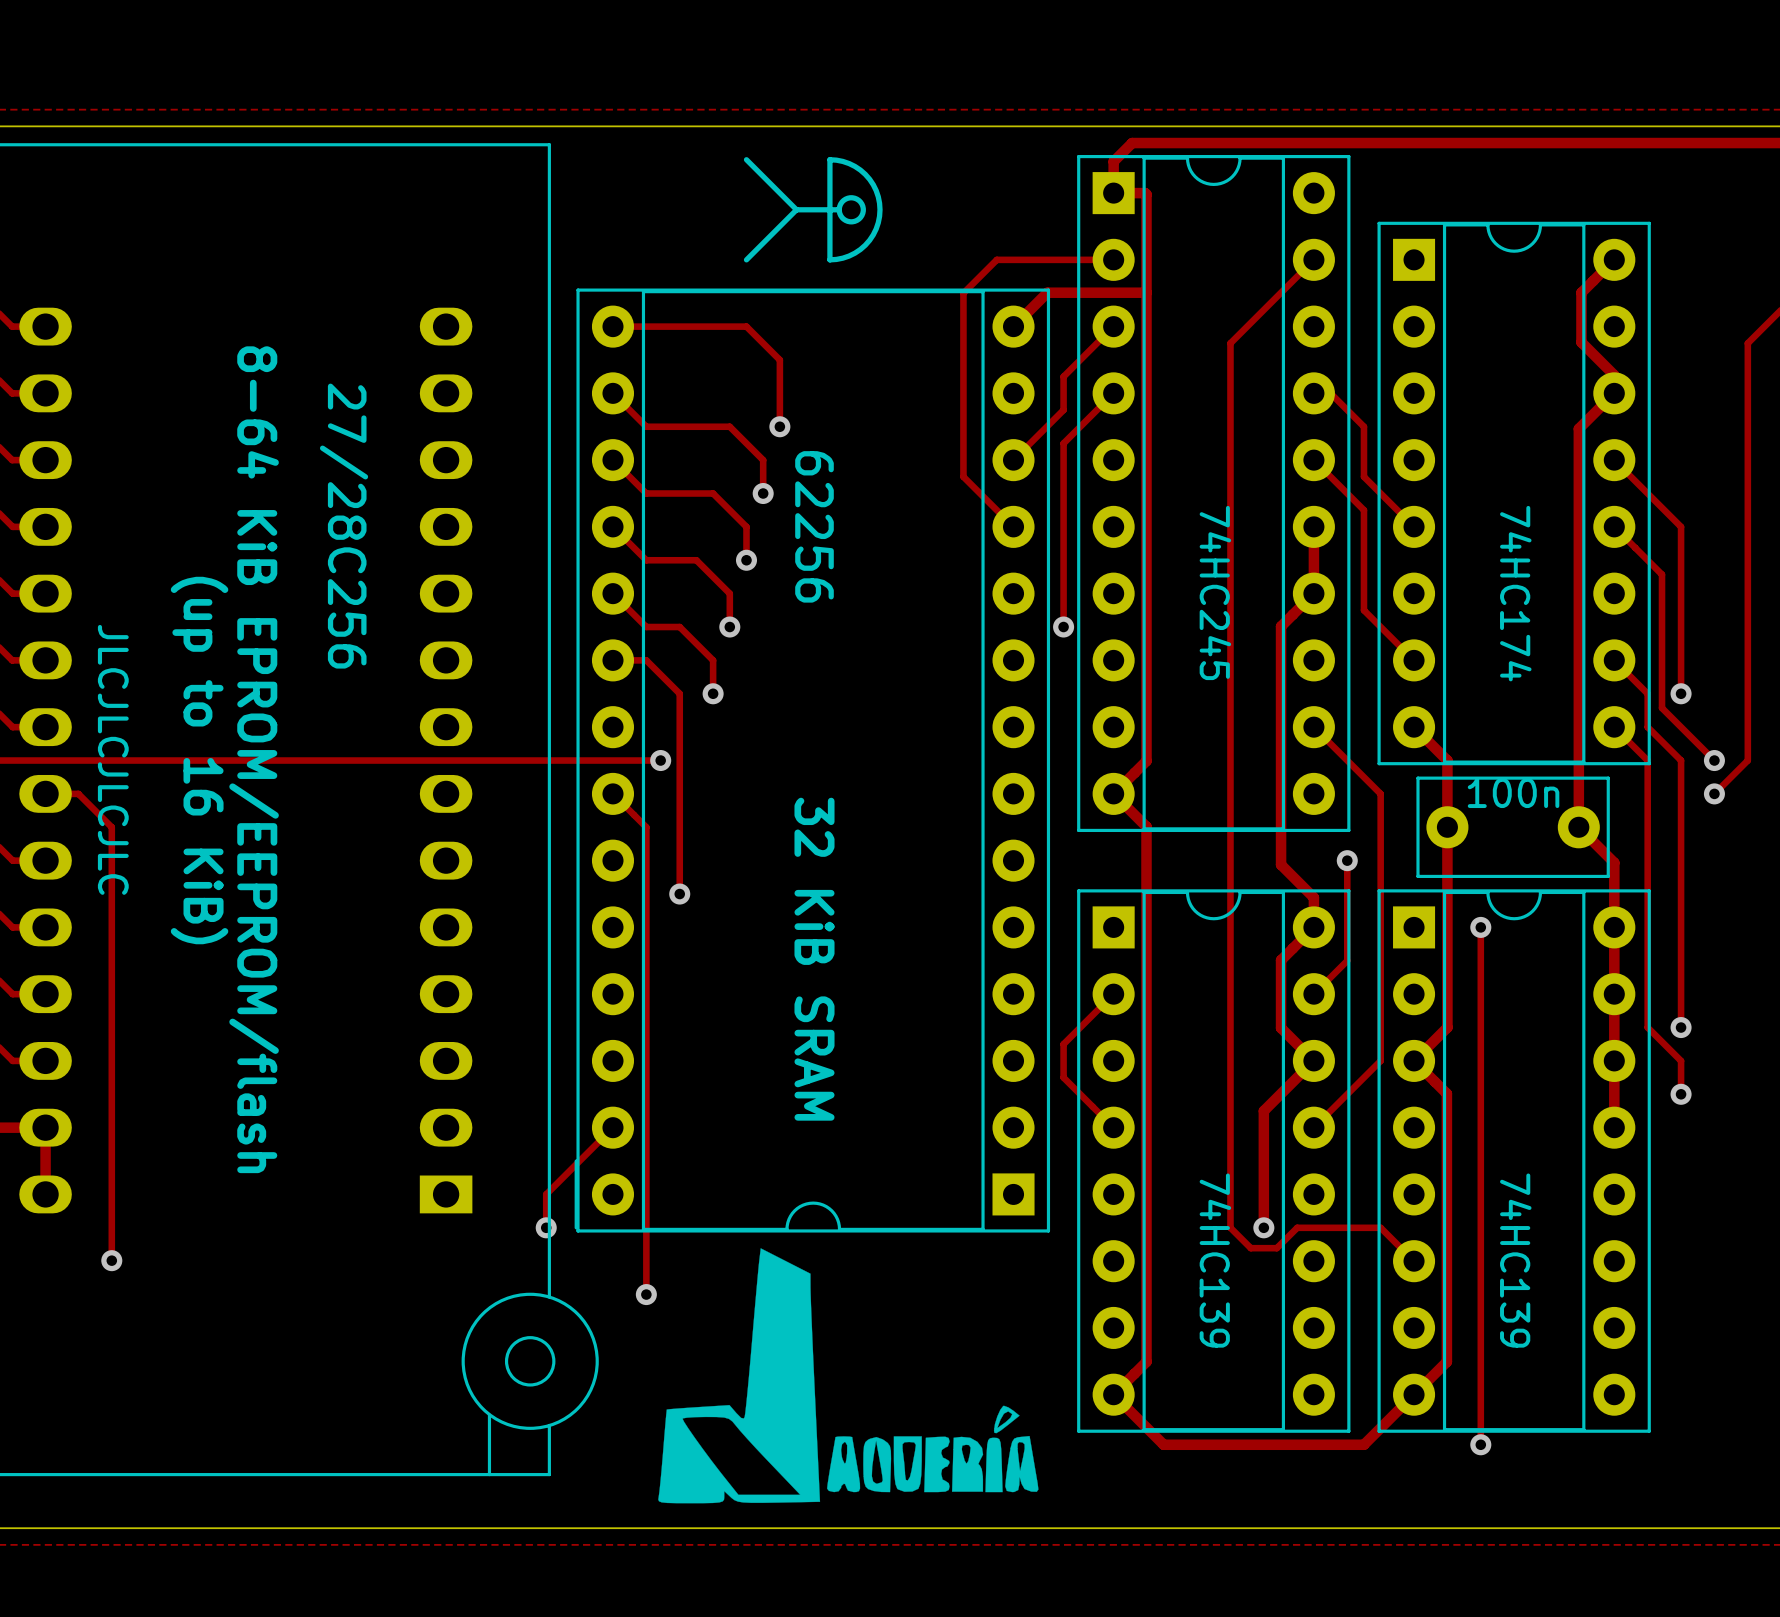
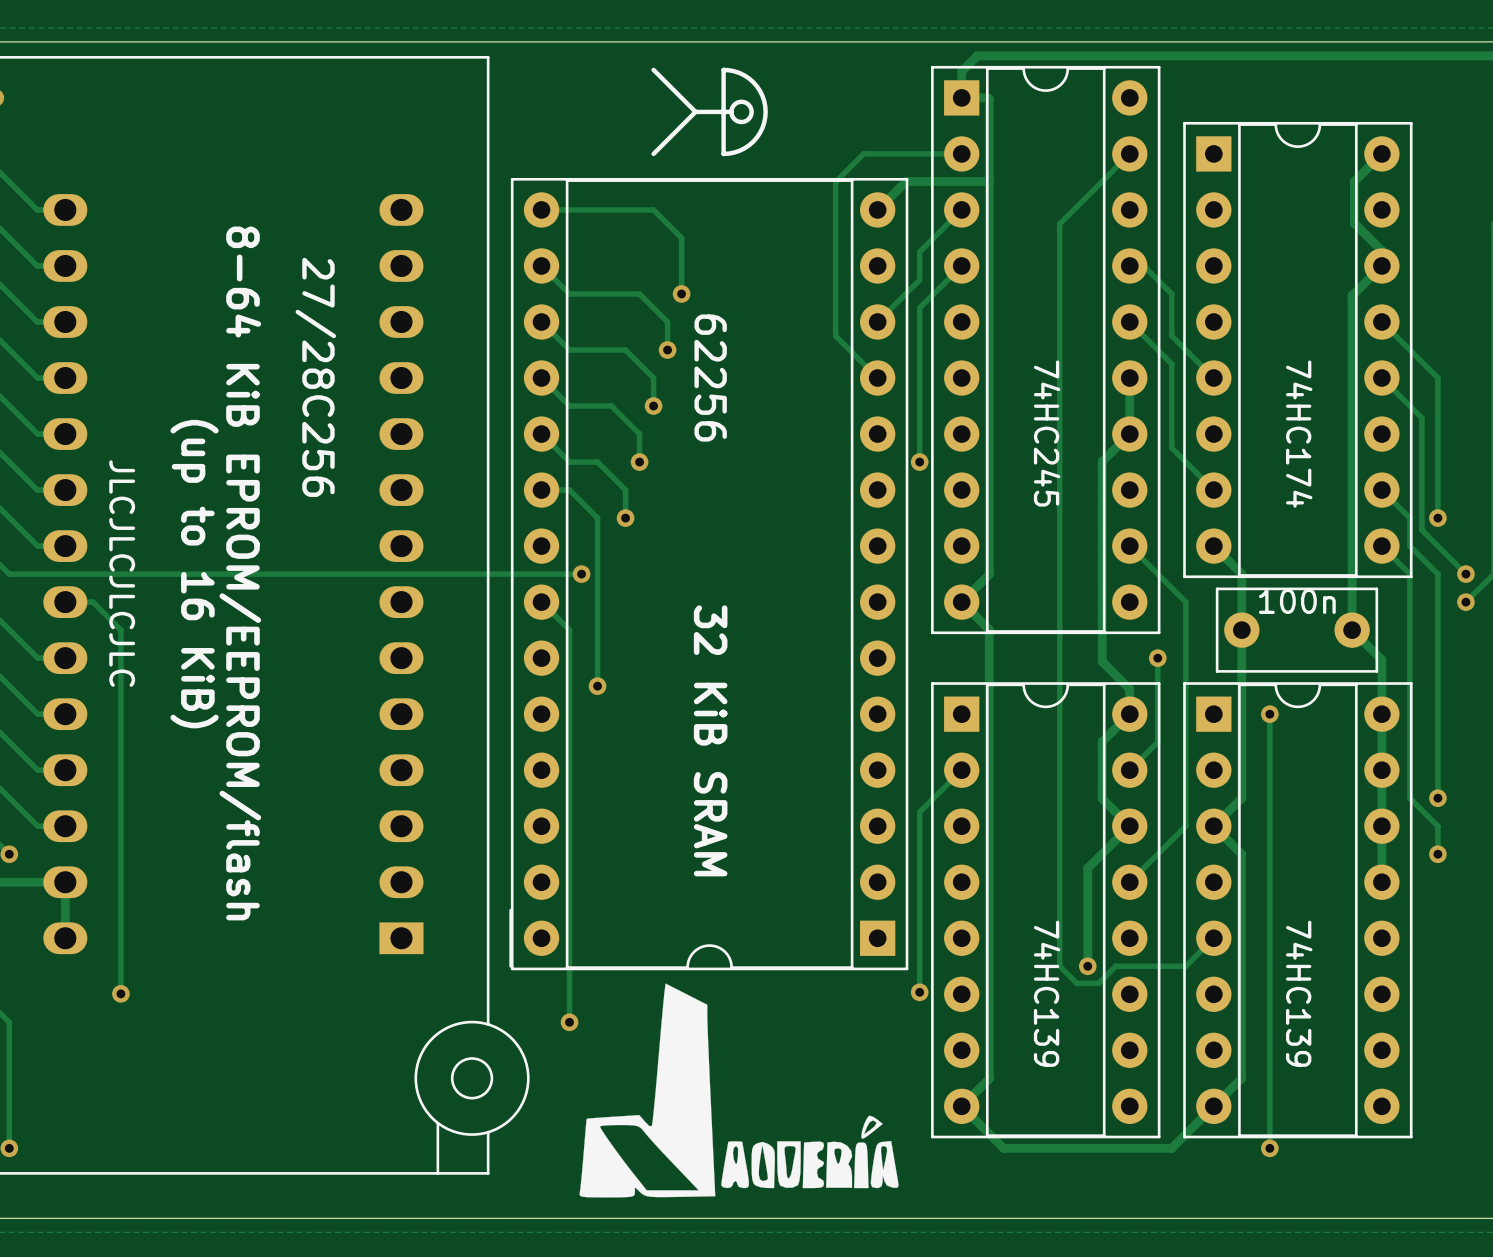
track: (1063, 1077) (1113, 1127) -> (919, 840) (919, 992)
track: (612, 1127) (546, 1194) (546, 1227) -> none
via: (546, 1227) -> none
track: (1380, 1227) (1414, 1261) -> (1185, 966) (1213, 938)
via: none -> (919, 992)

